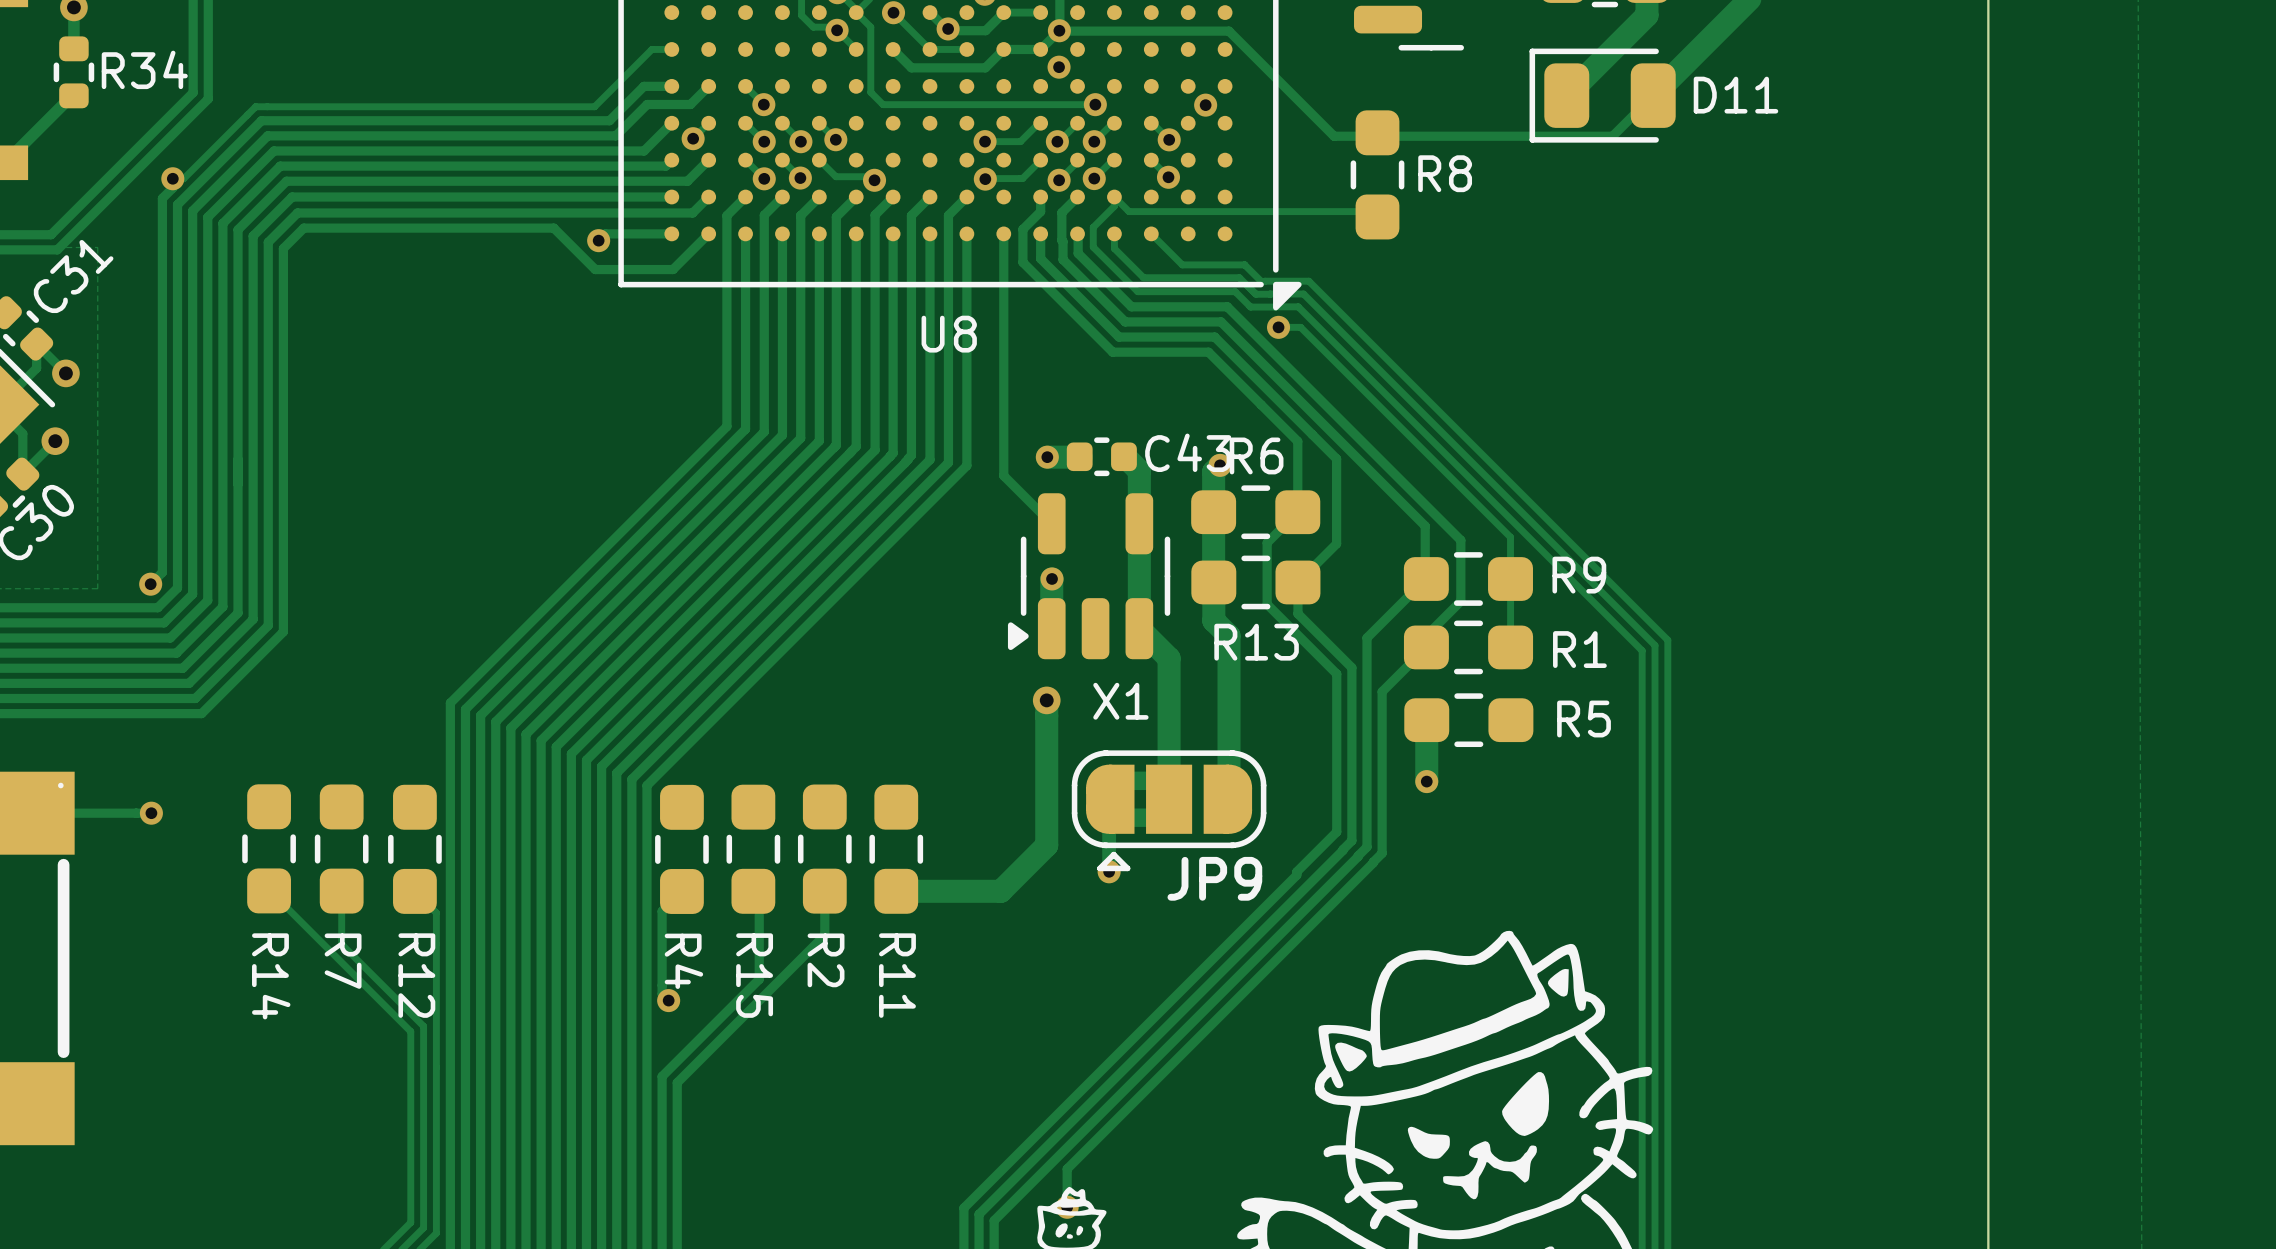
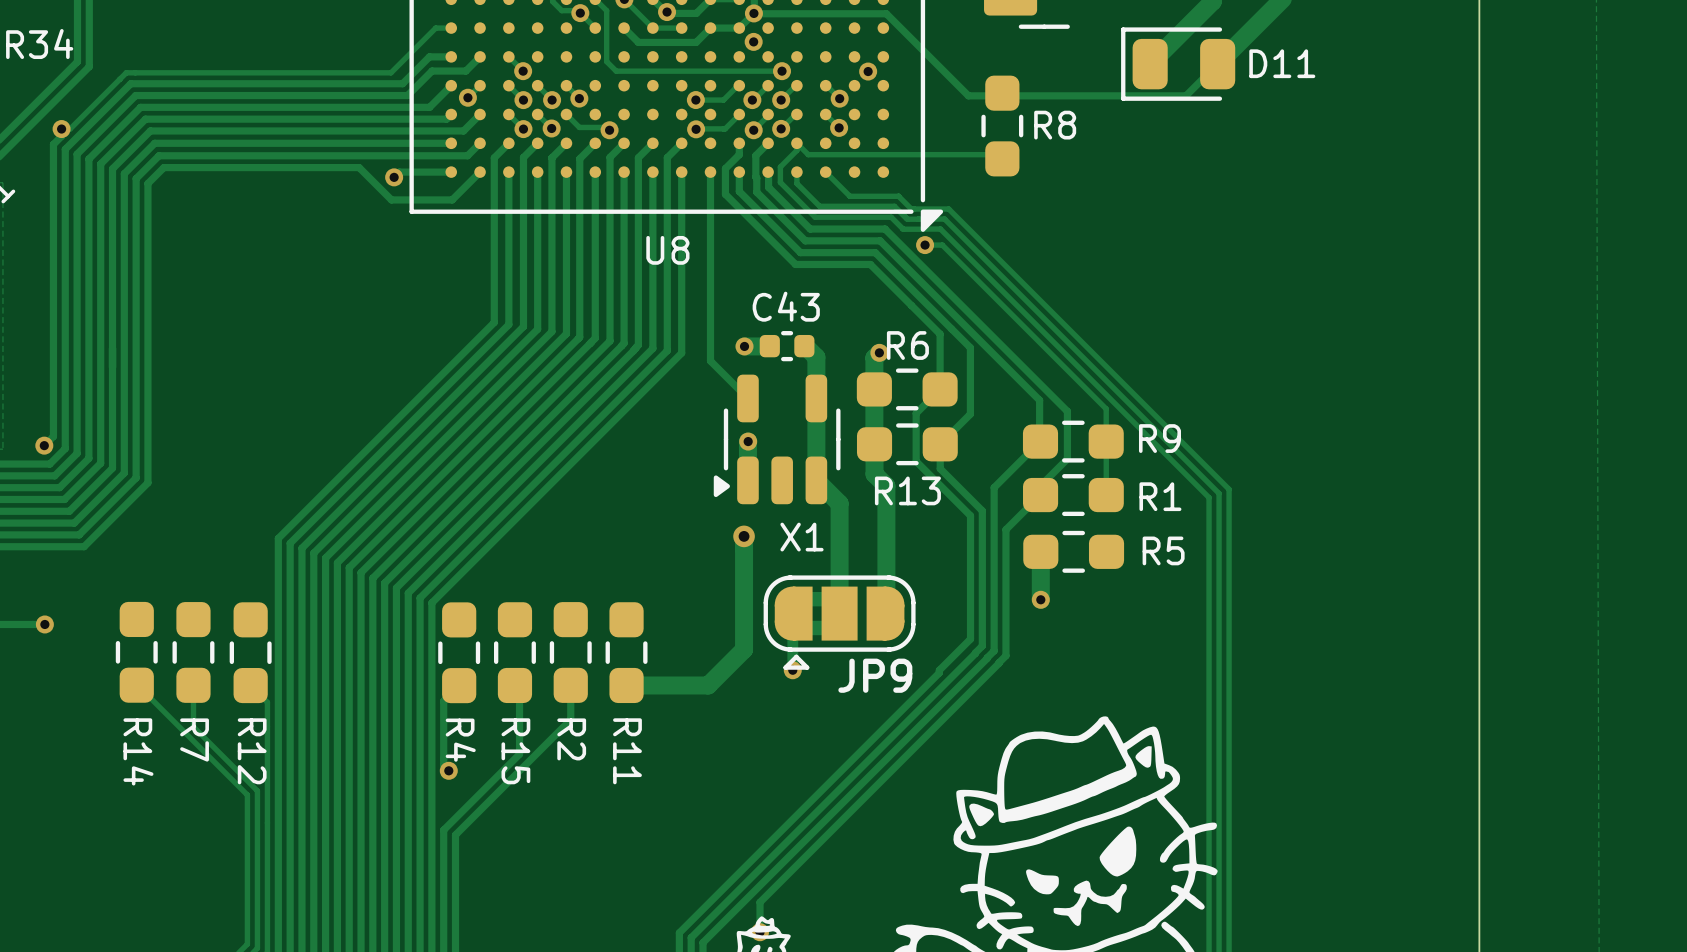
C43 name position: C43 (1188, 452) -> C43 (786, 306)

